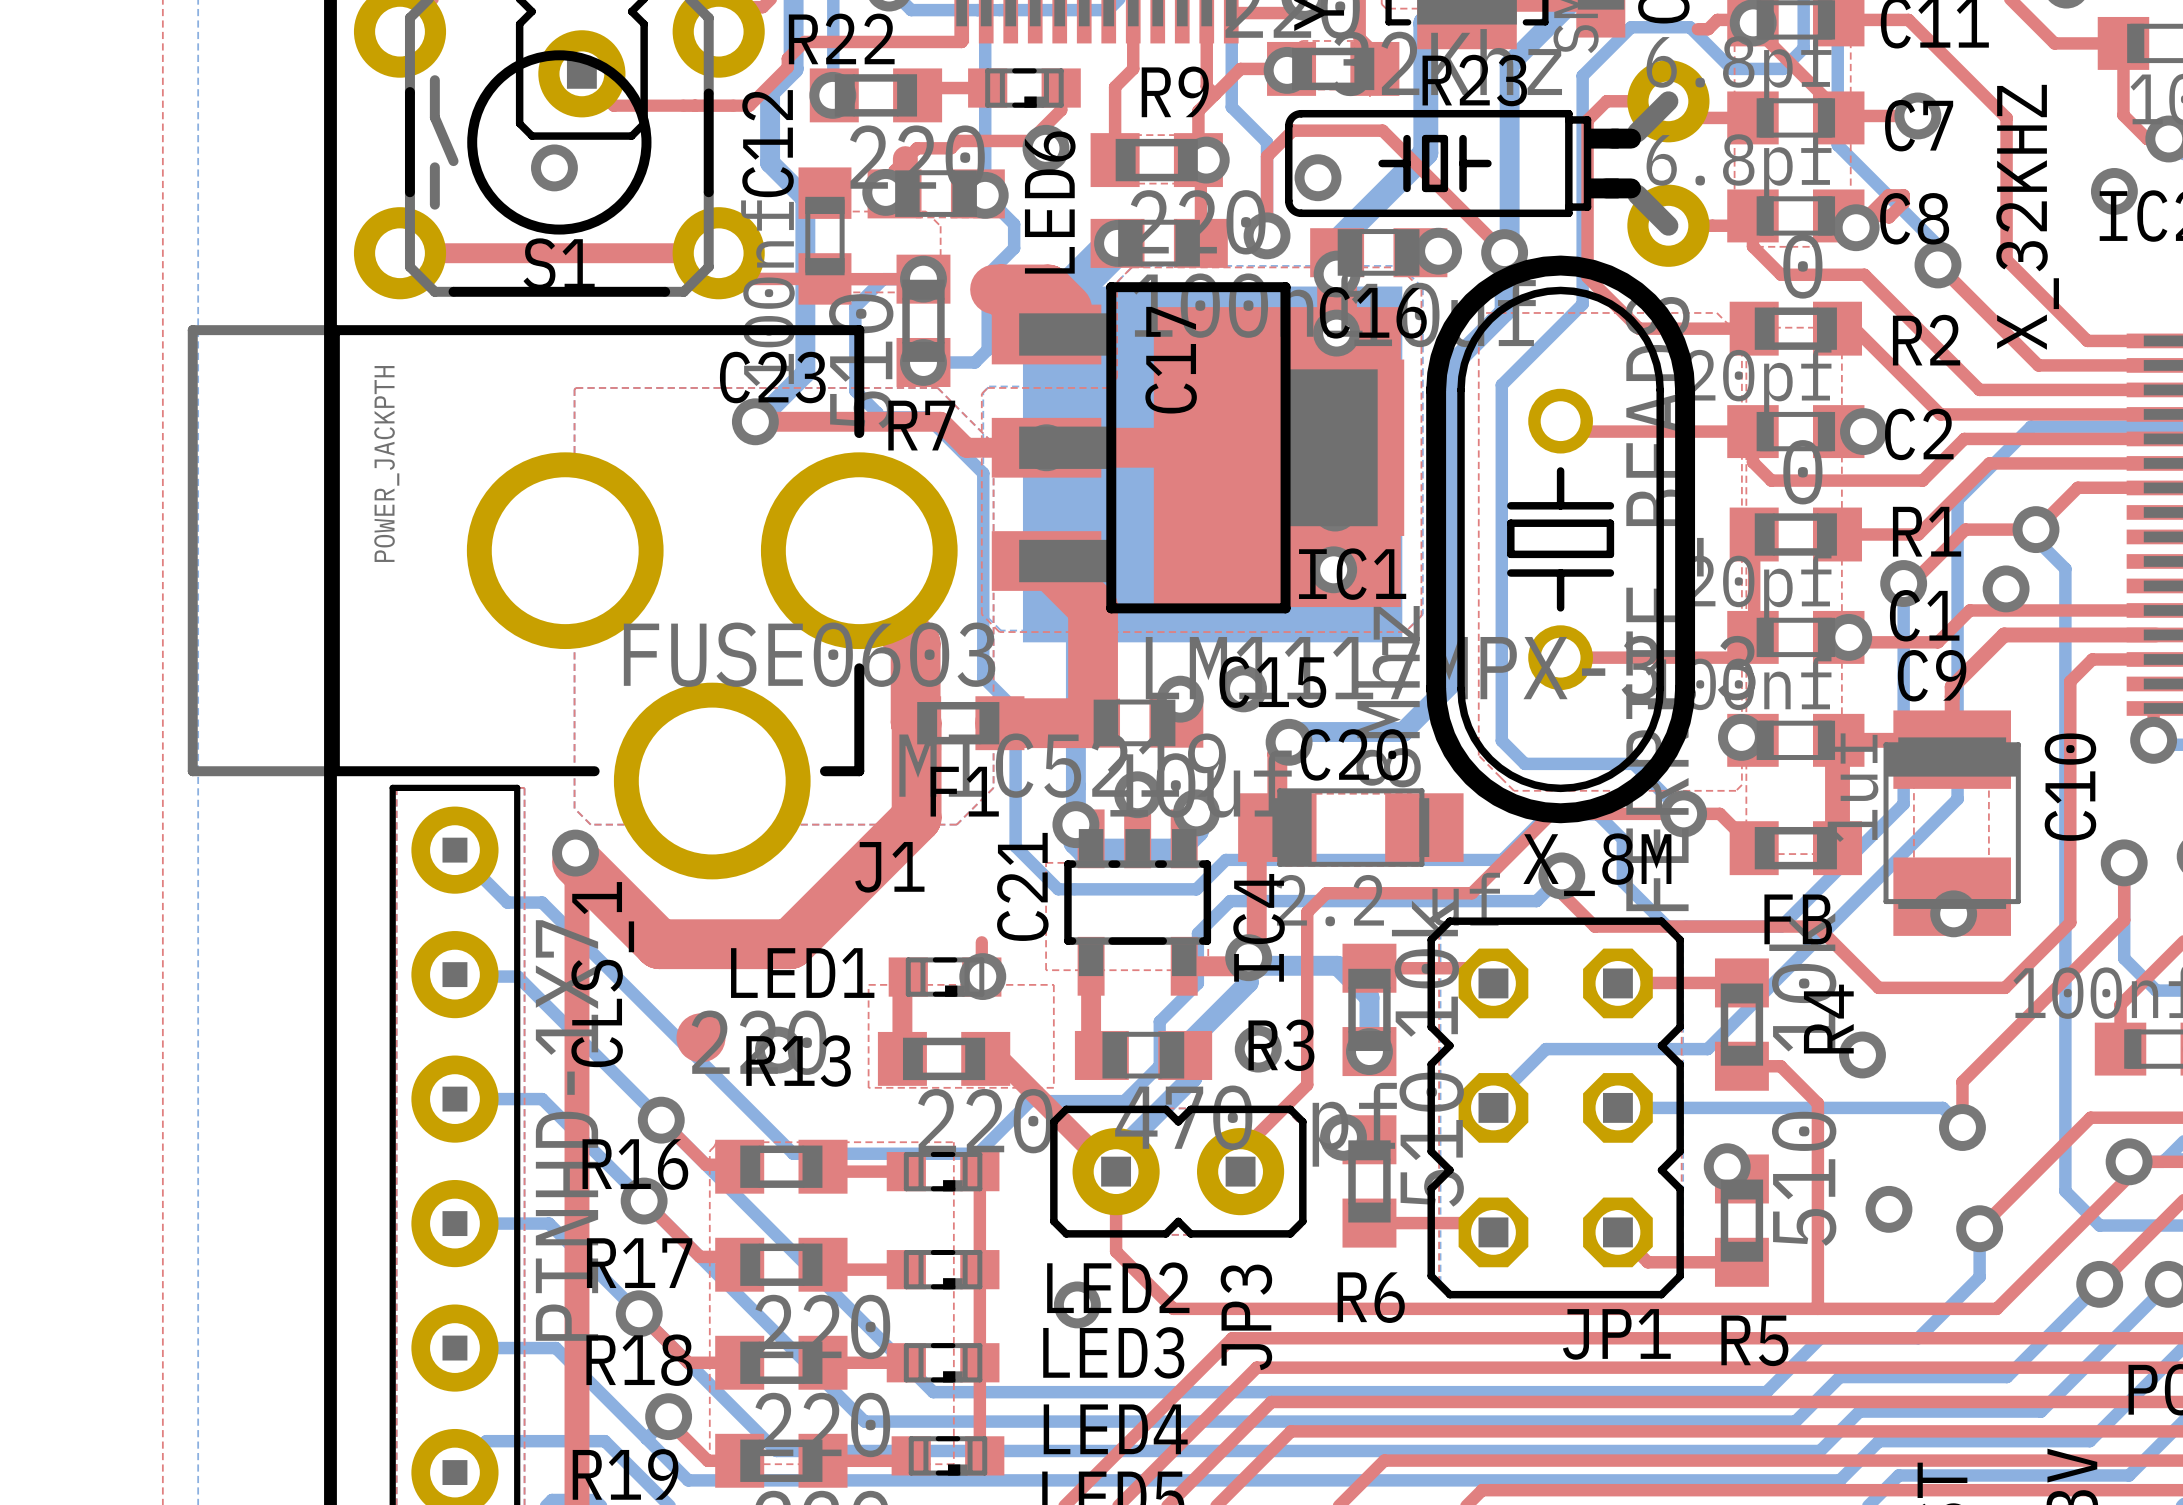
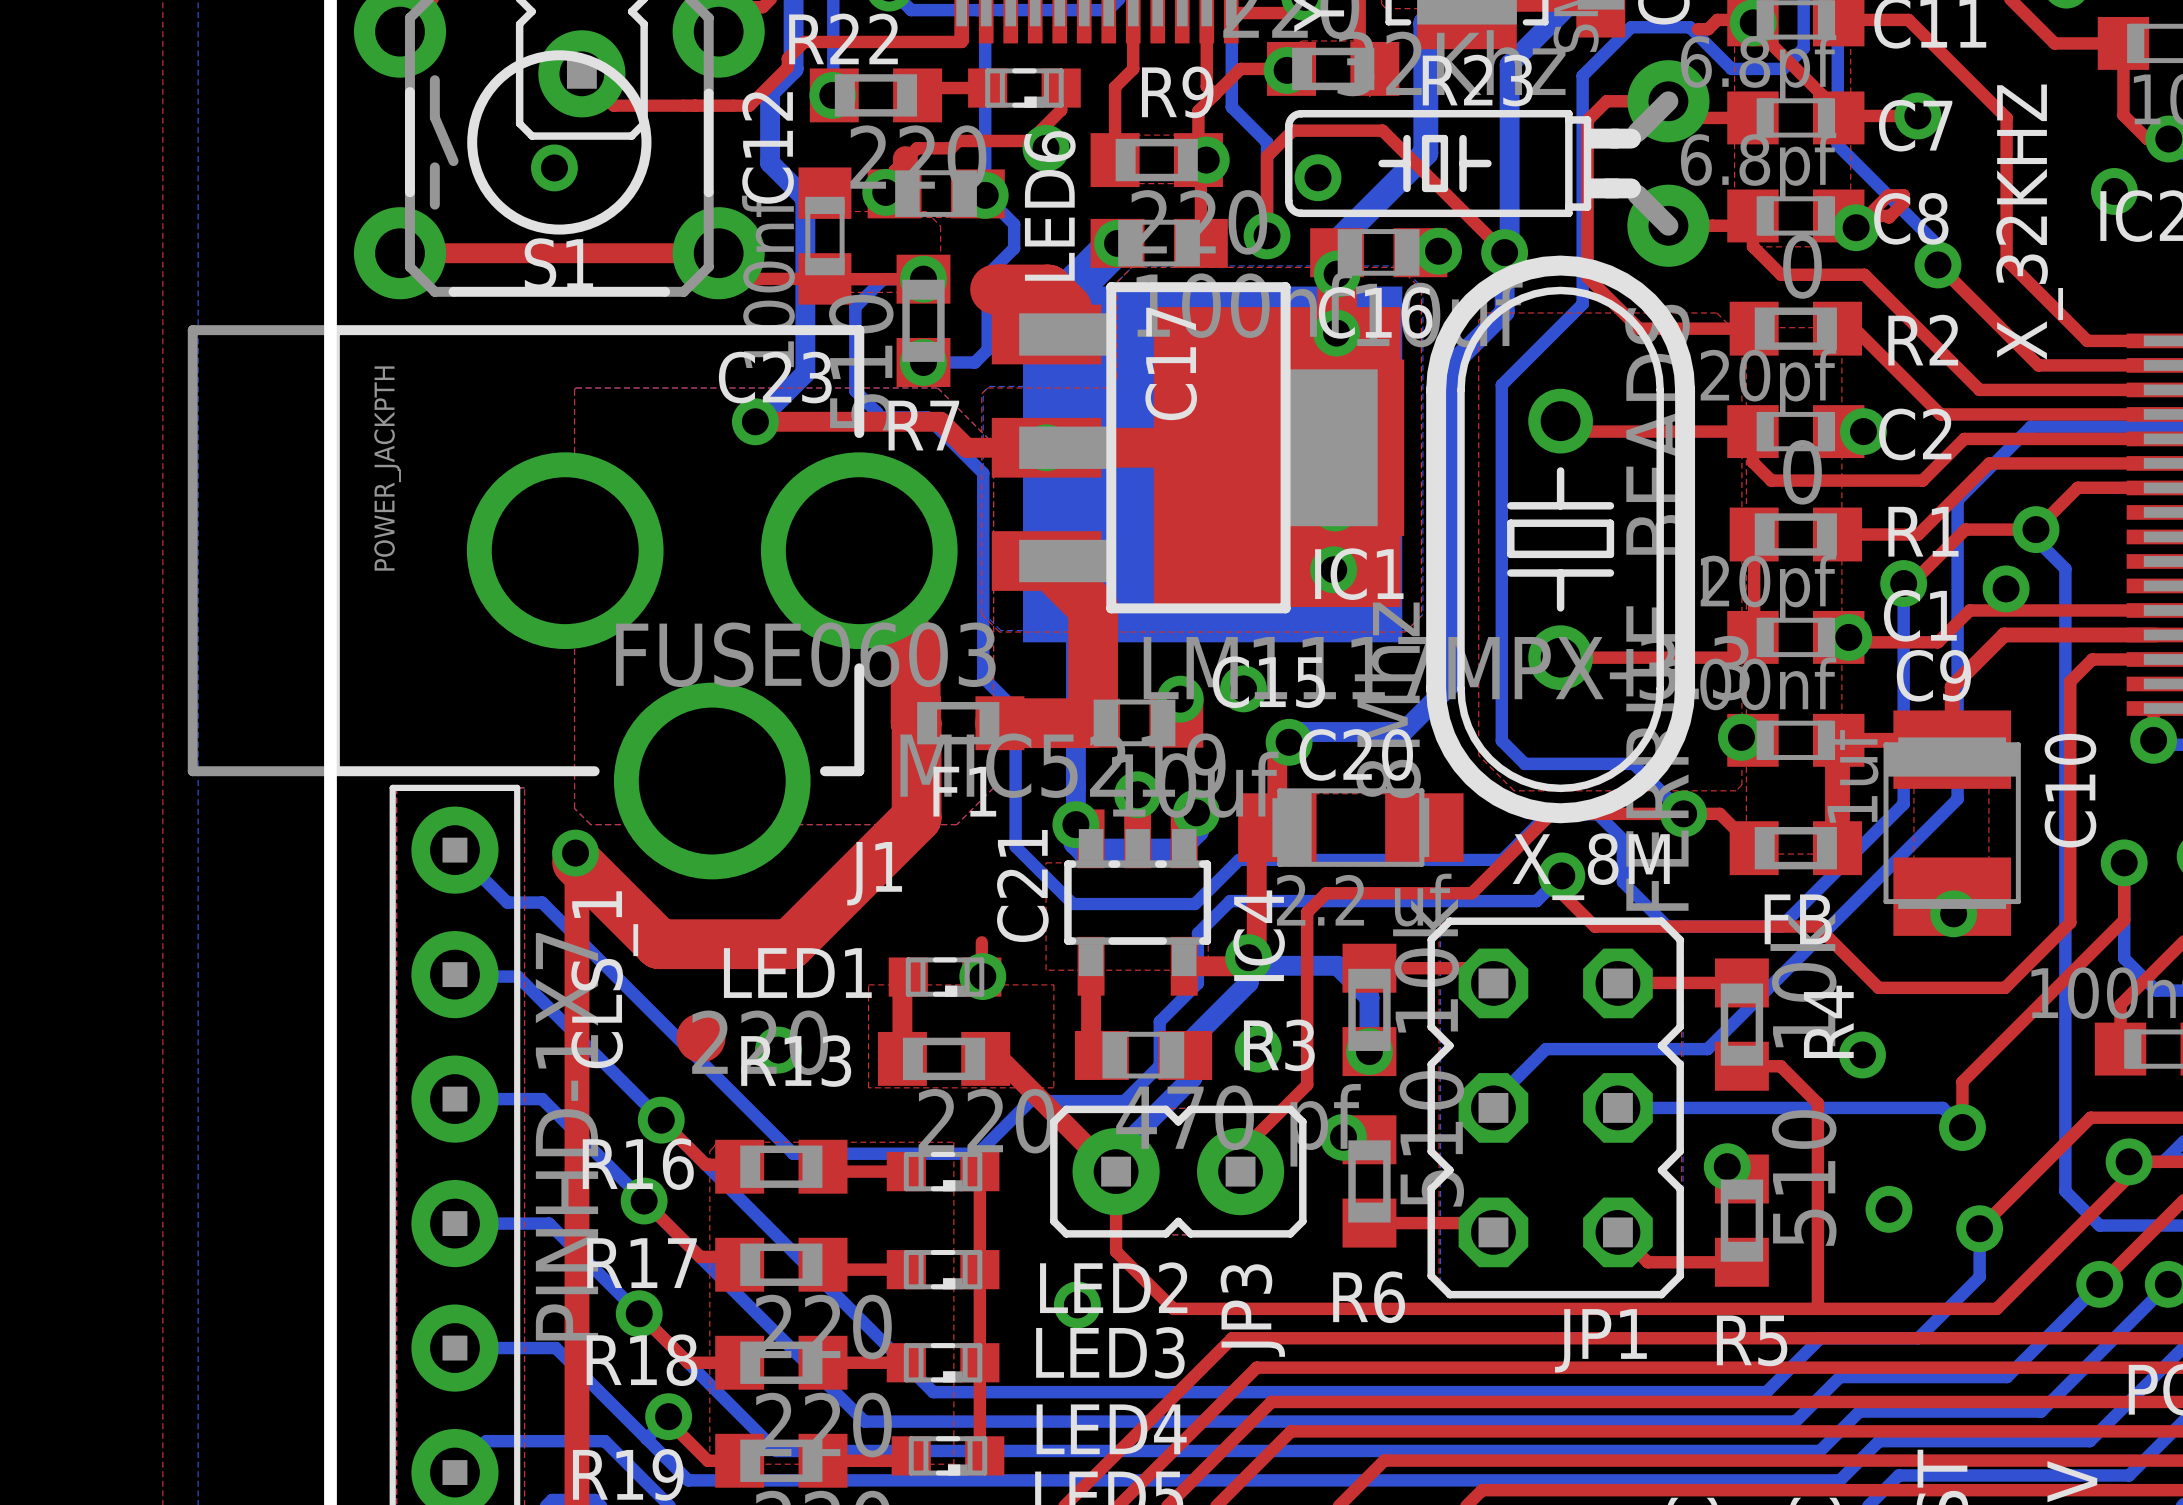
bottom track: (1239, 859) (1225, 859) (1196, 889) (1058, 889) -> (1239, 859) (1194, 904) (1072, 904) (1058, 889)

